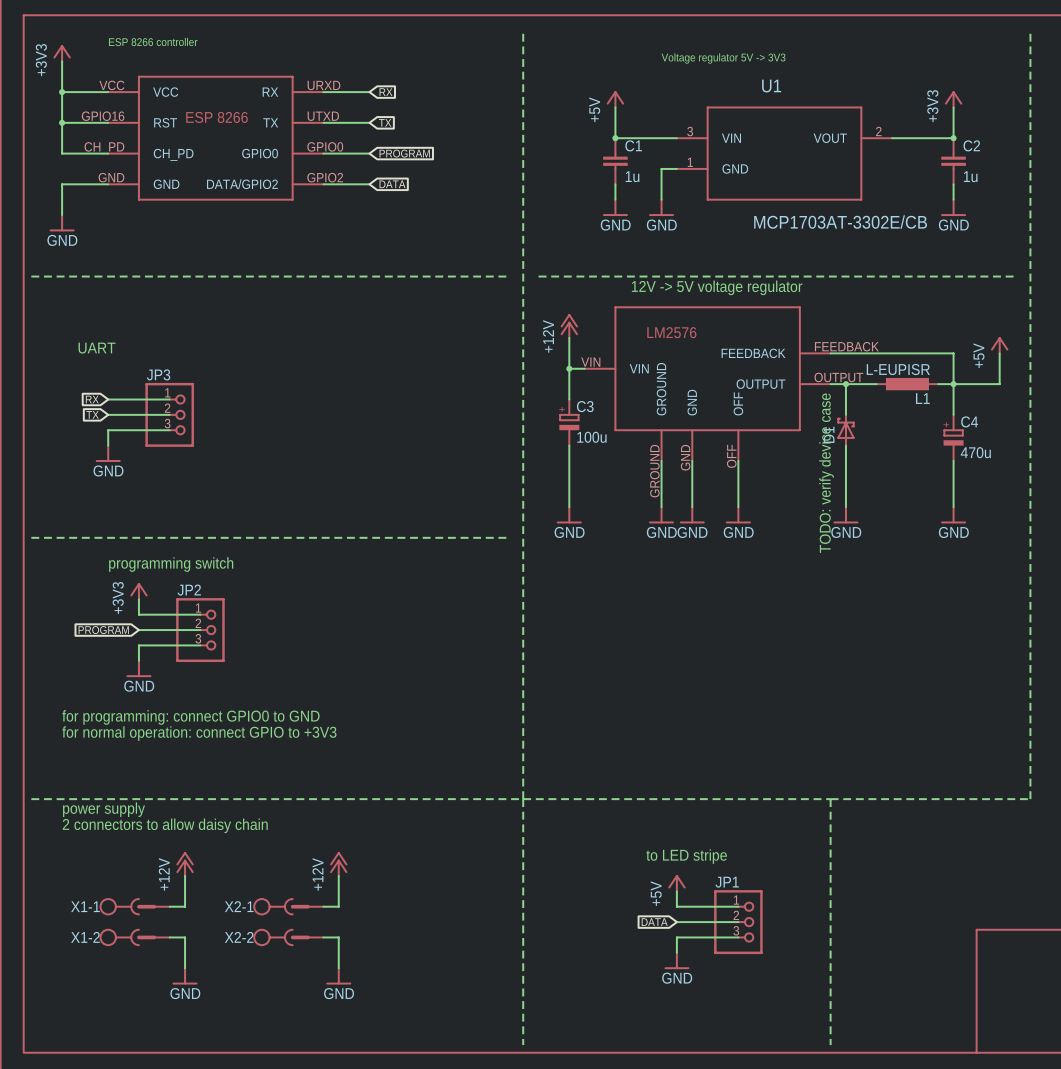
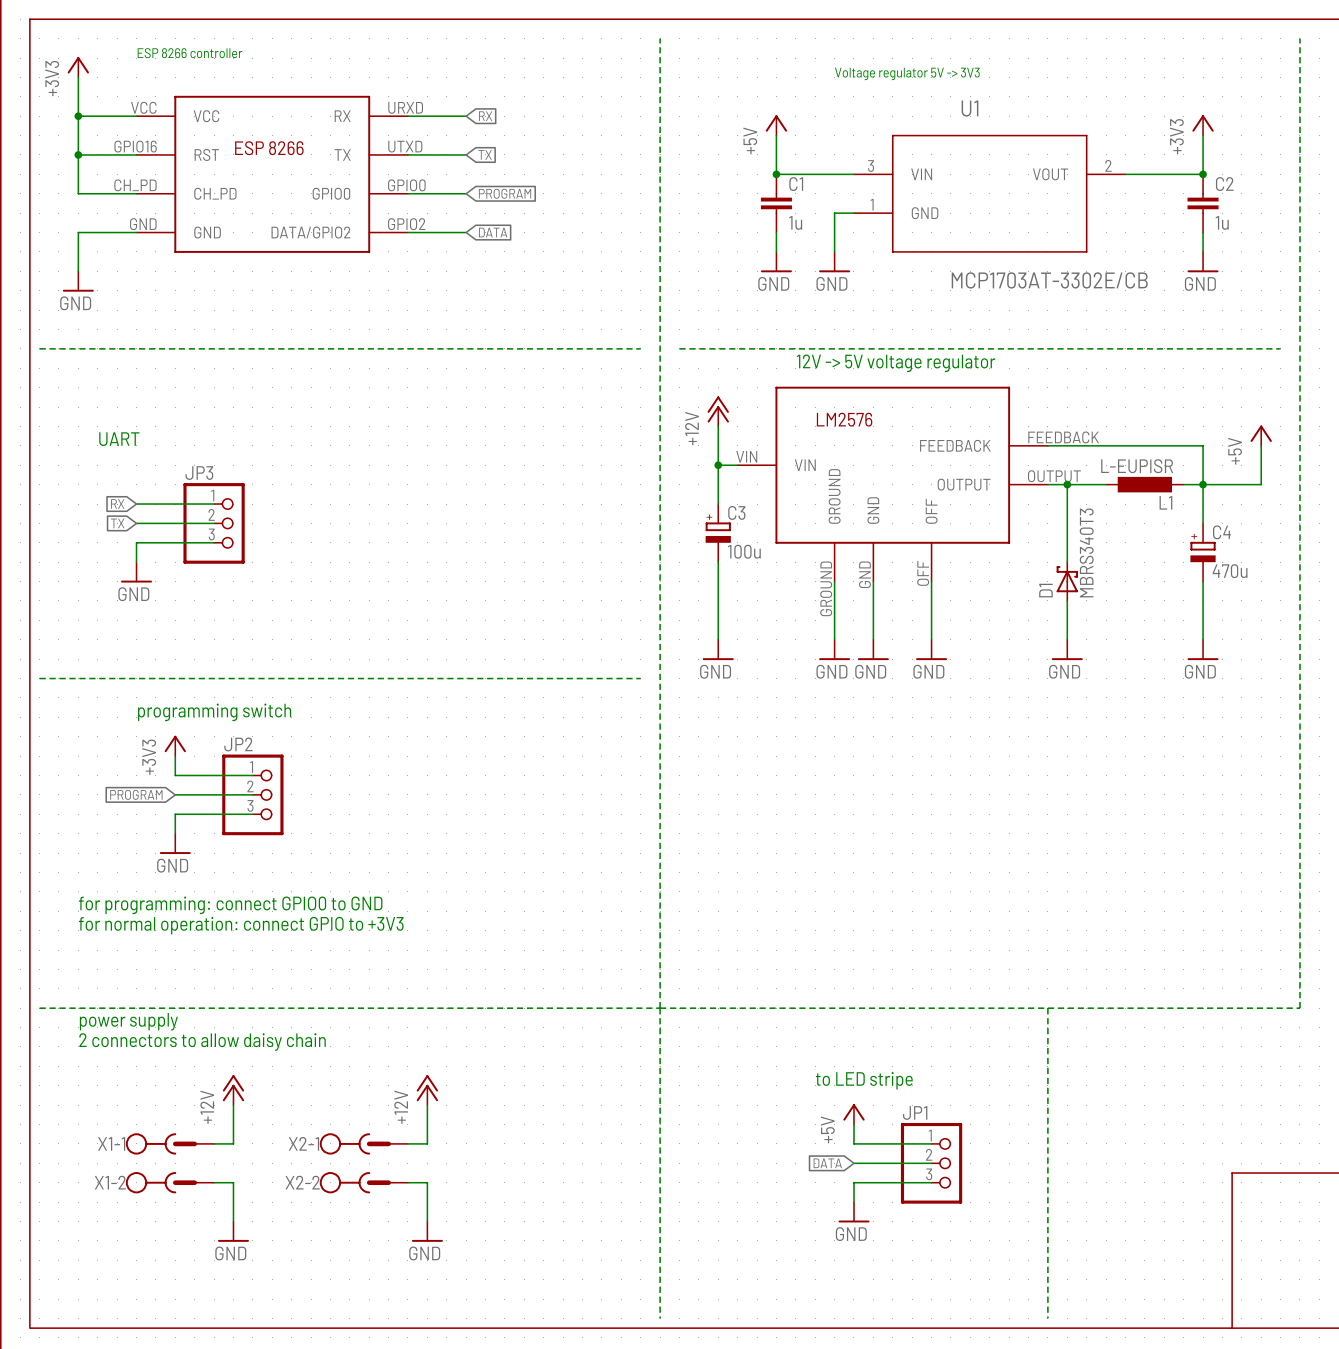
D1 position: (845, 430) -> (1067, 581)
D1 value: none -> MBRS340T3 (1086, 552)
text: TODO: verify device case (826, 473) -> none

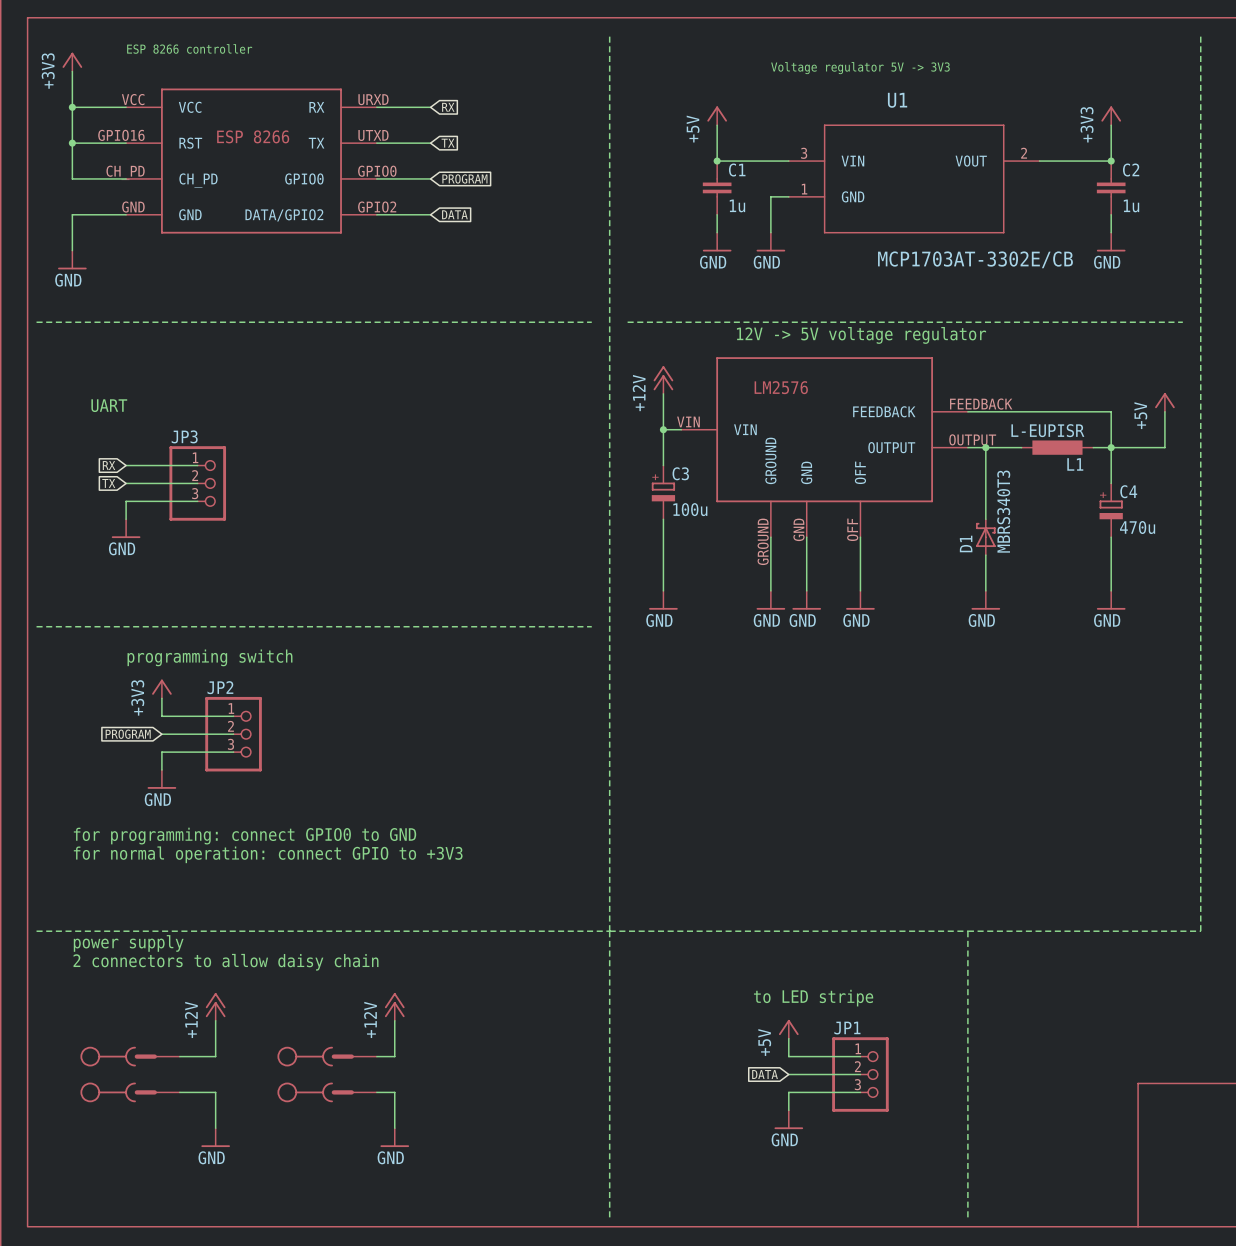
X1-1: (169, 1143) -> none
X2-1: (363, 1143) -> none
part: none -> (130, 1074)
part: none -> (327, 1074)
X1-2: (169, 1182) -> none
X2-2: (363, 1182) -> none

